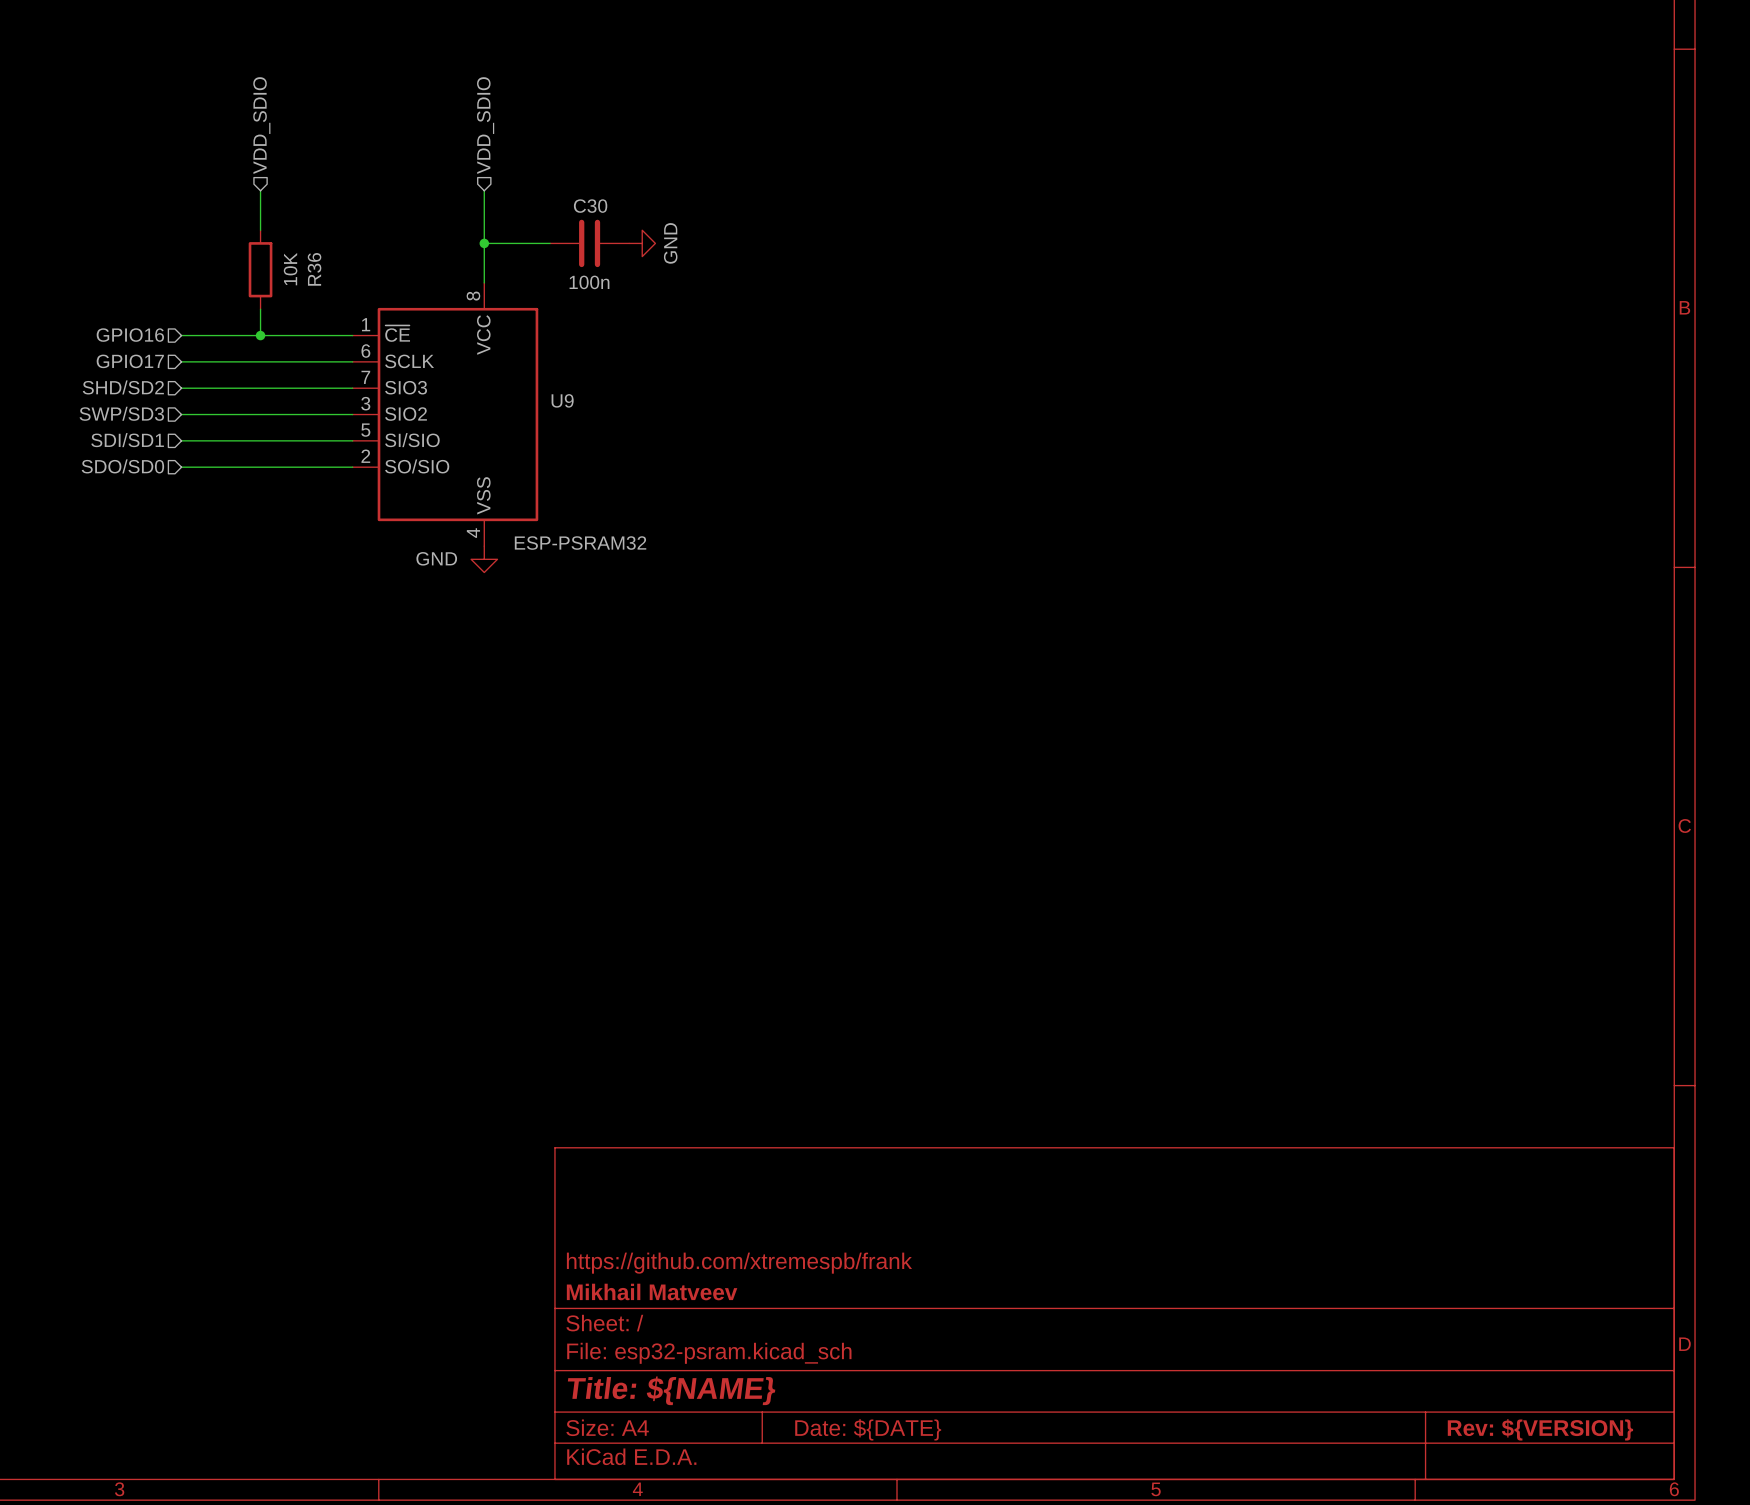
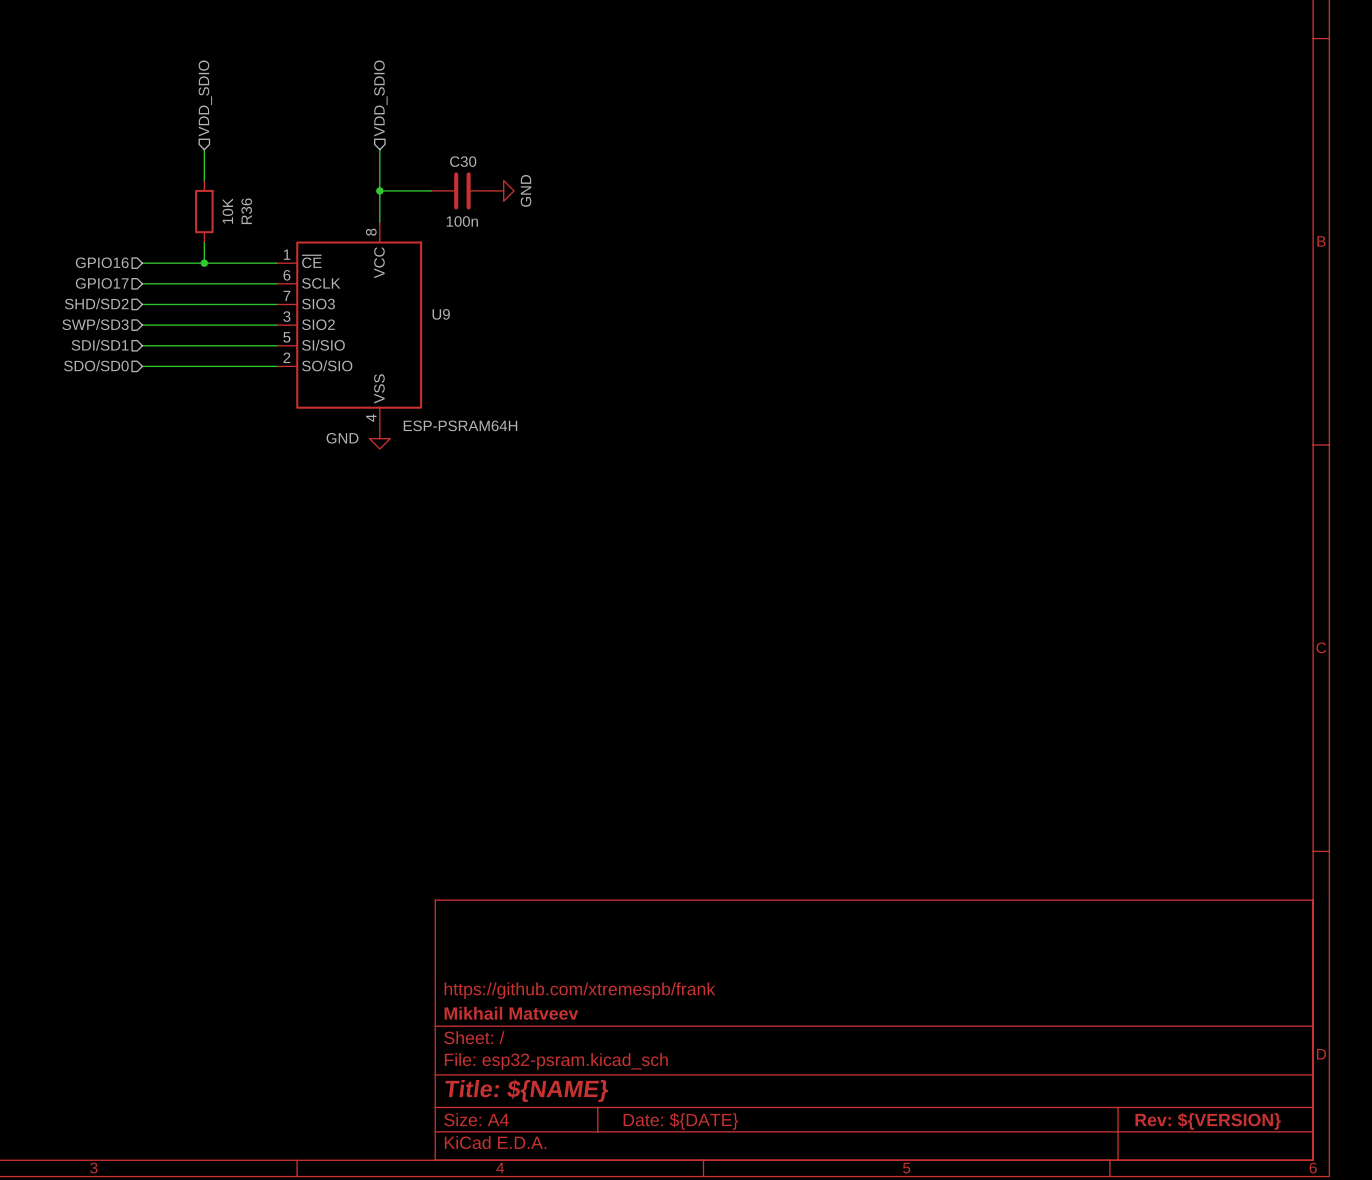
U9 value: ESP-PSRAM32 (580, 543) -> ESP-PSRAM64H (460, 425)

